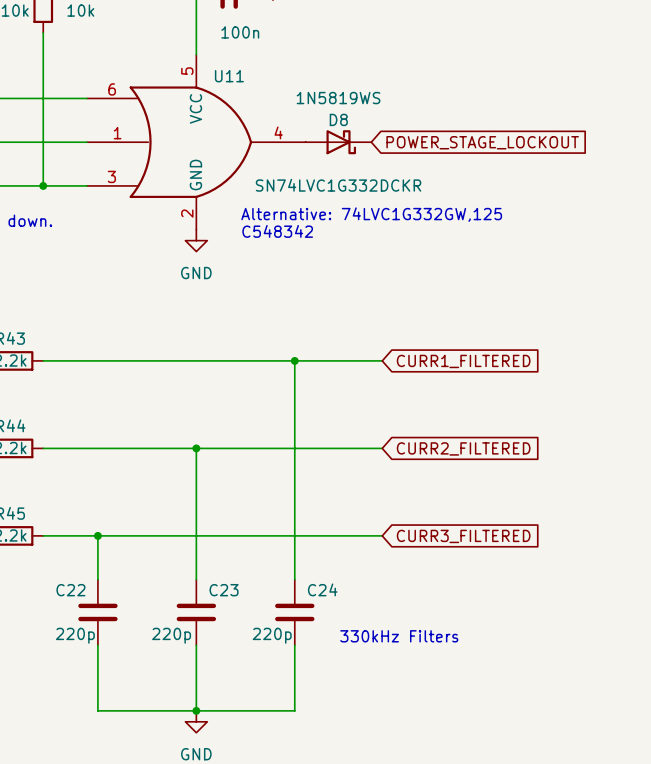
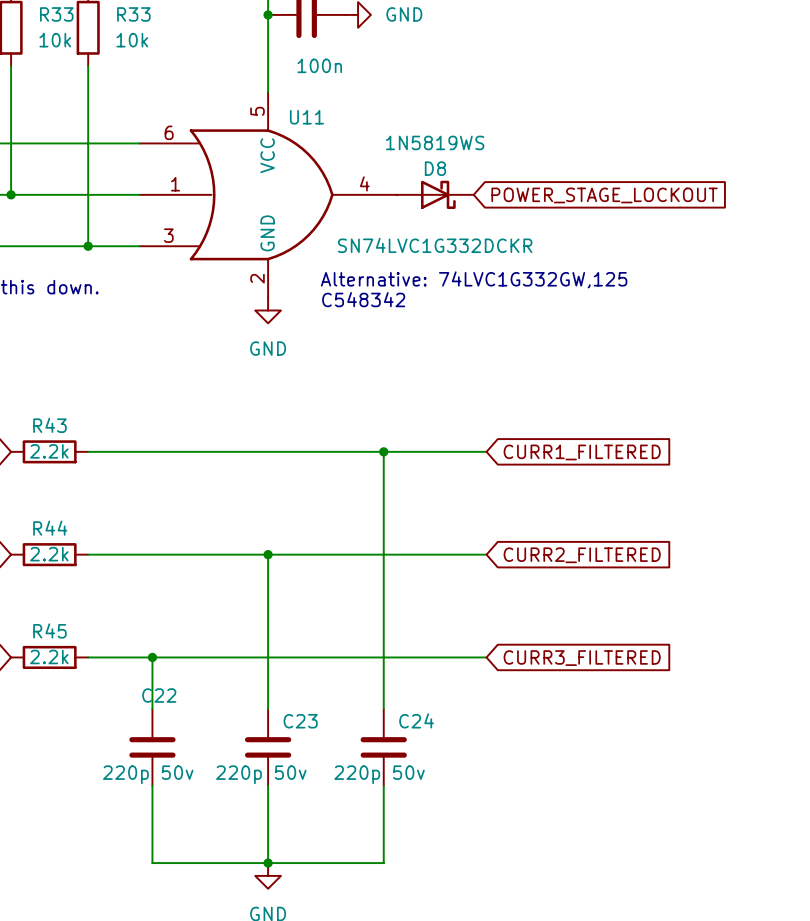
C22 name position: C22 (70, 590) -> C22 (159, 695)
C22 value: 220p (75, 635) -> 220p 50v (148, 774)
C23 value: 220p (171, 635) -> 220p 50v (261, 774)
C24 value: 220p (272, 635) -> 220p 50v (379, 774)
text: 330kHz Filters (399, 636) -> none

